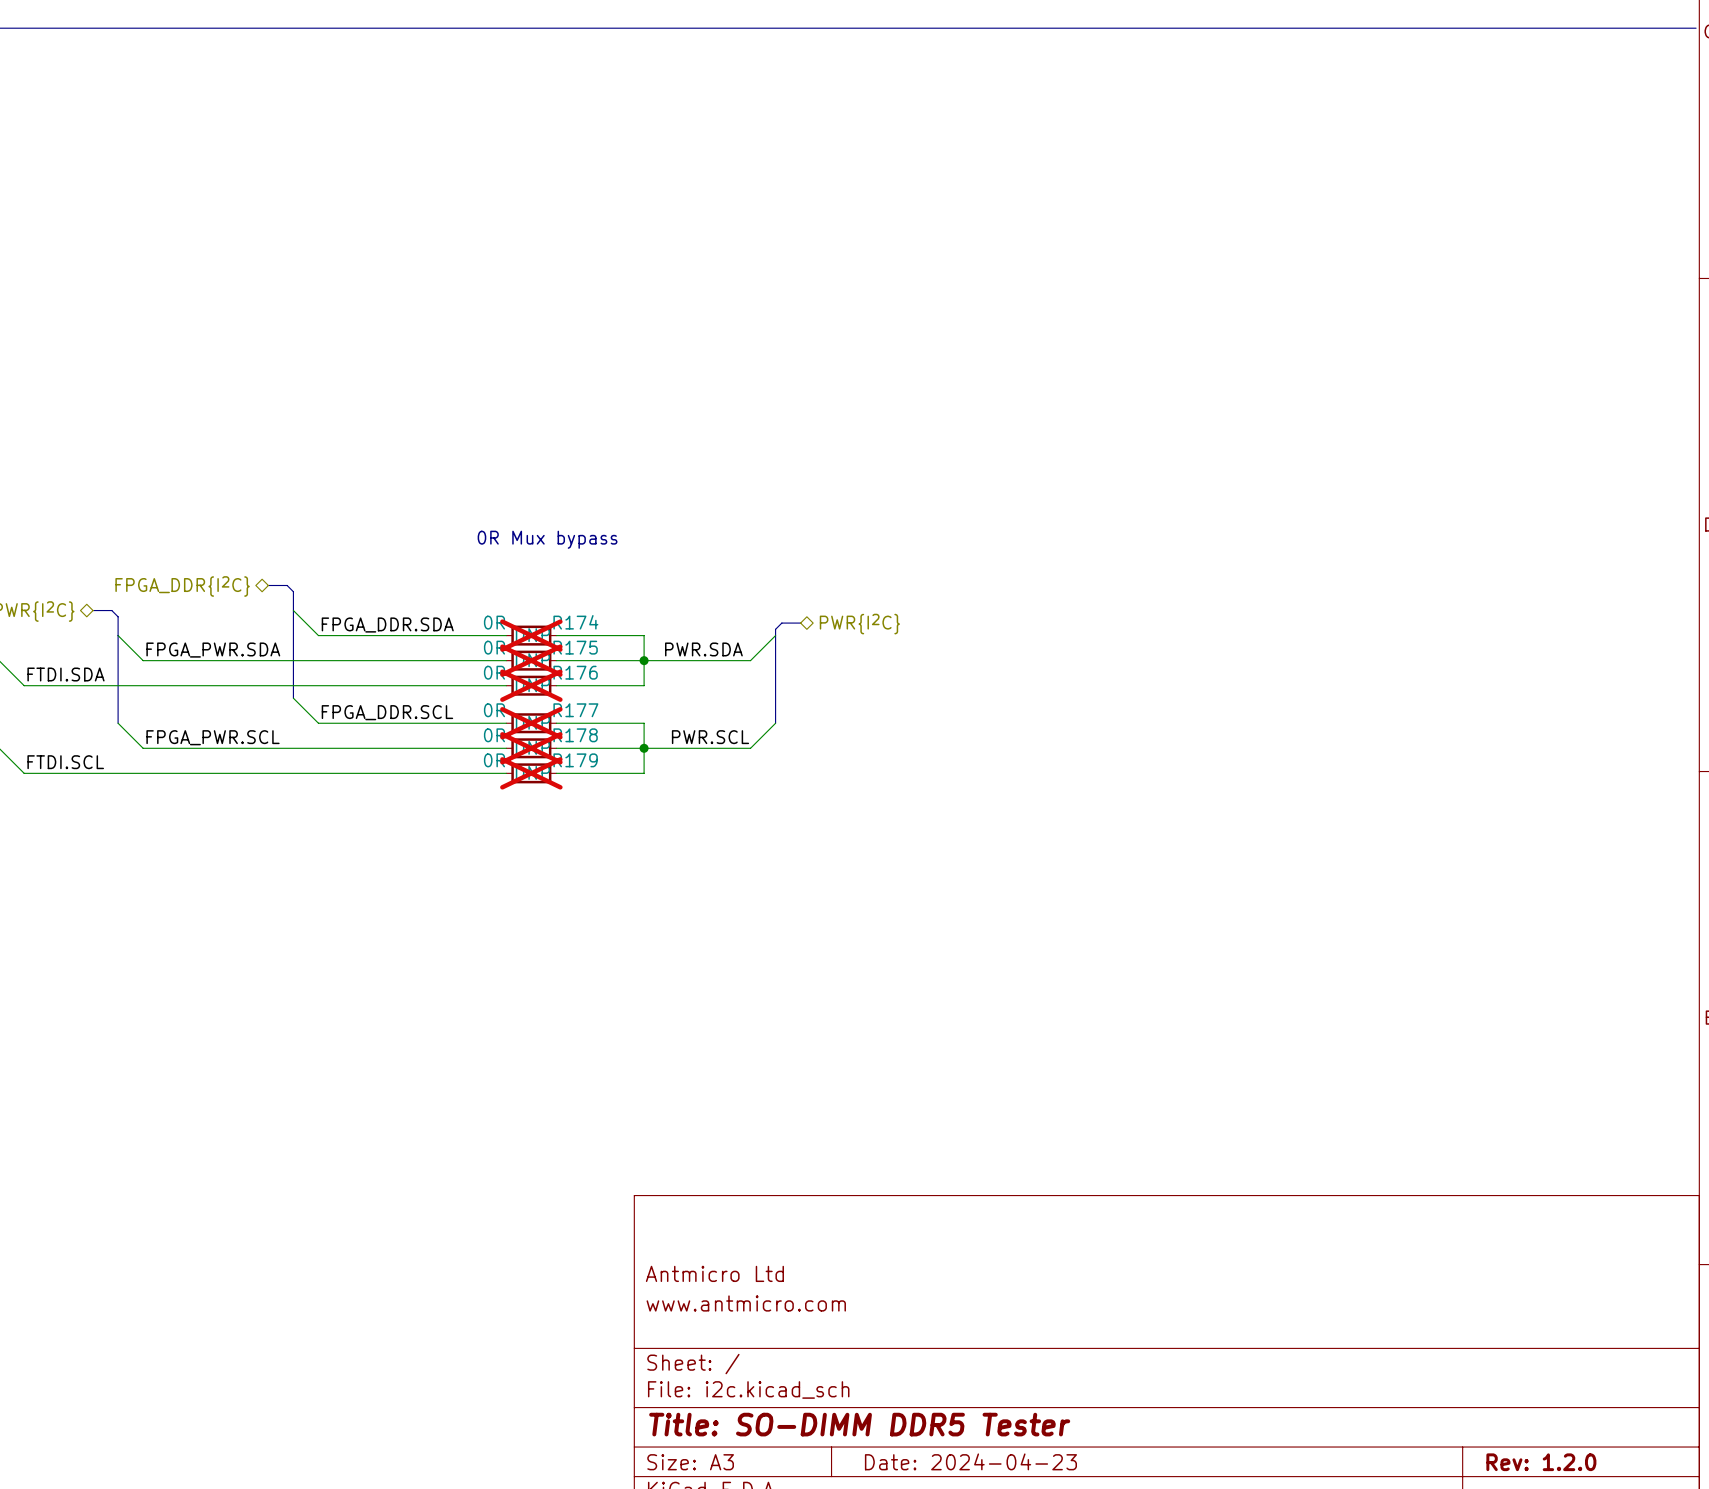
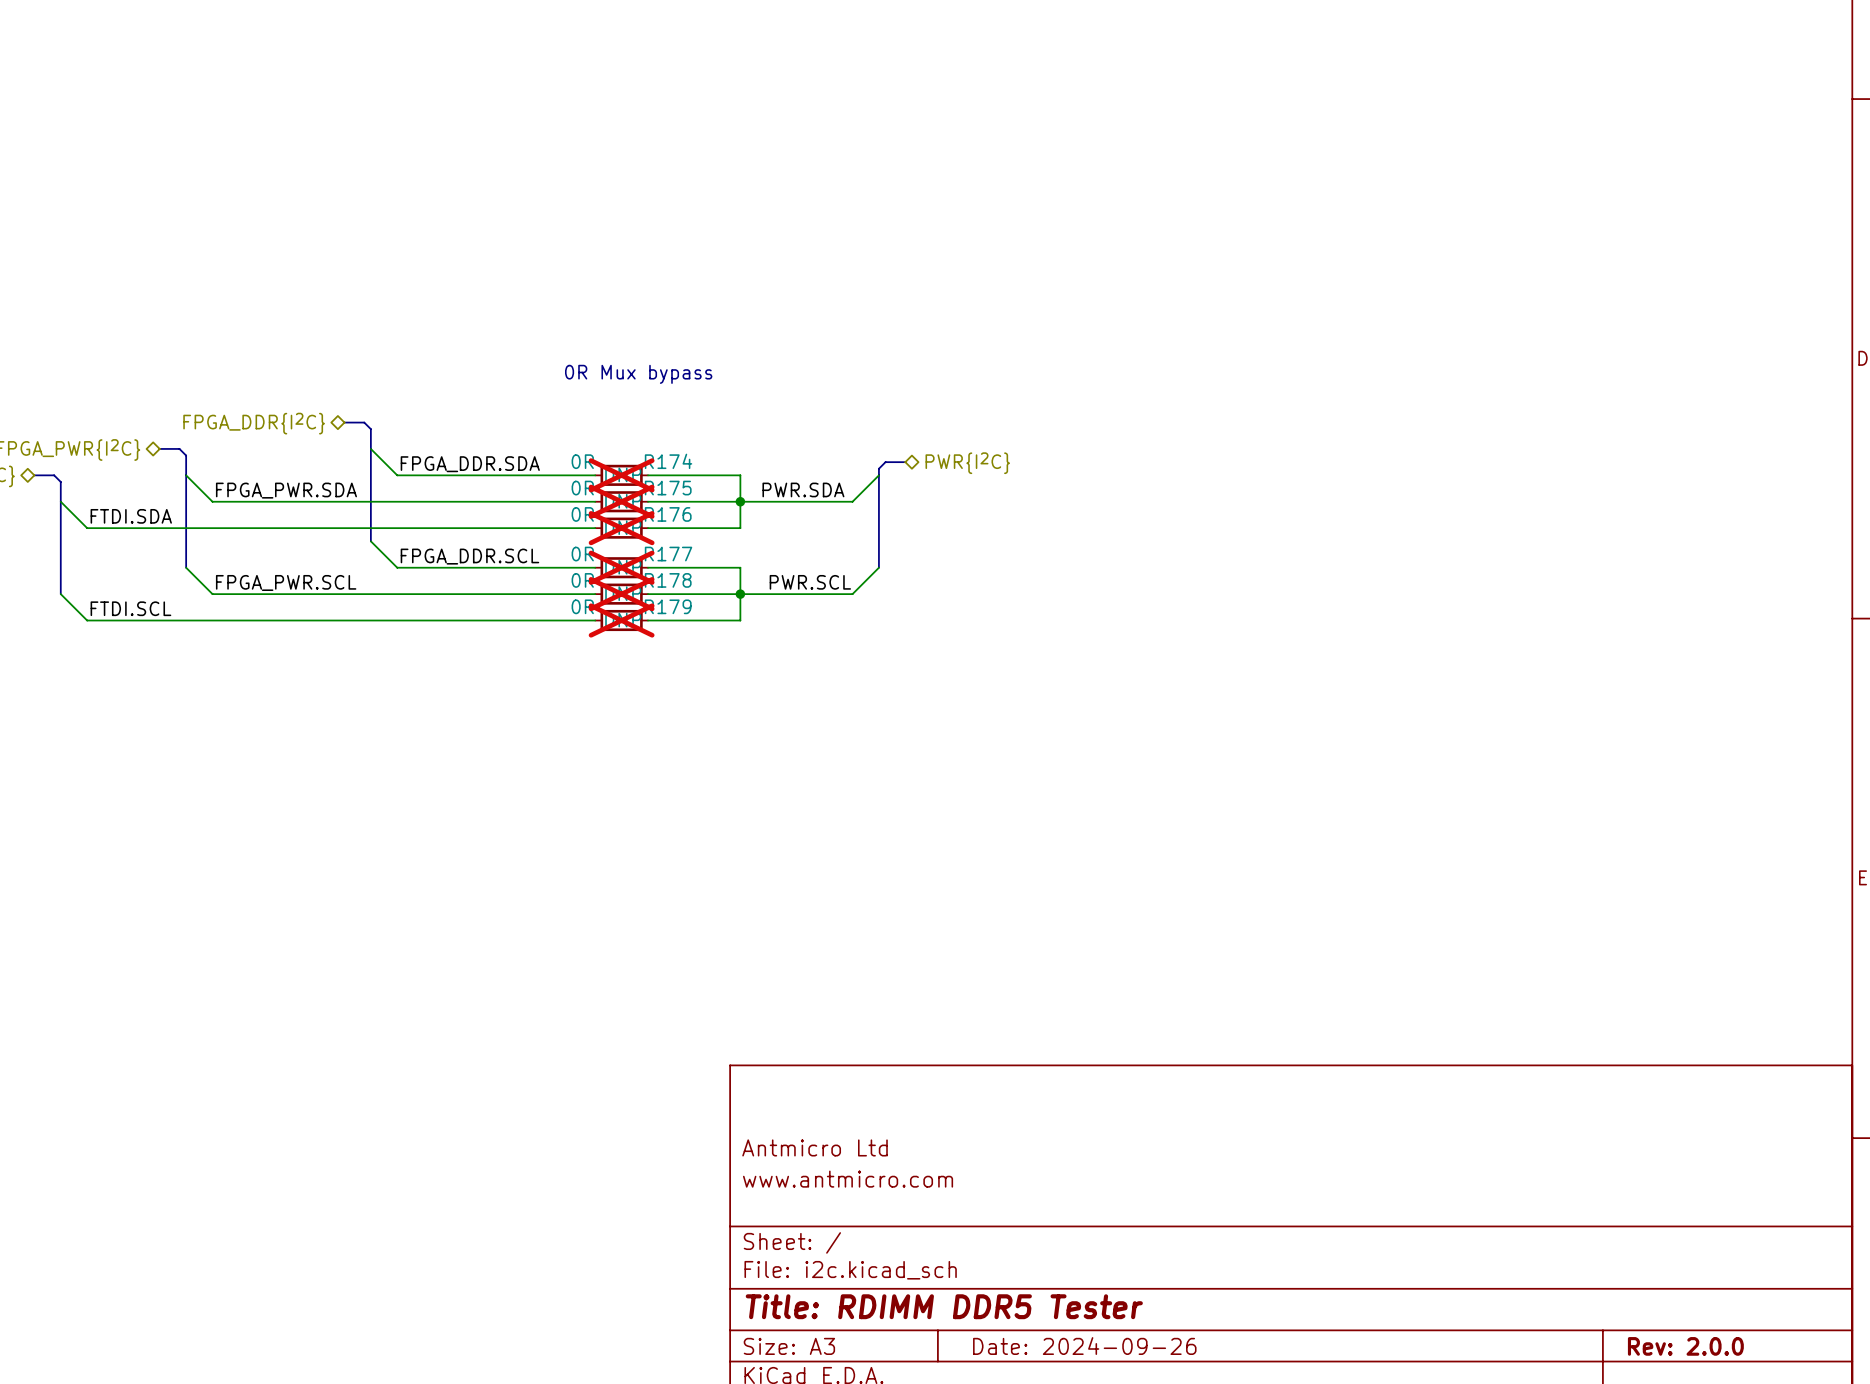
title block: Title: SO-DIMM DDR5 Tester (859, 1424) -> Title: RDIMM DDR5 Tester (944, 1306)
title block: Date: 2024-04-23 (970, 1461) -> Date: 2024-09-26 (1084, 1346)
title block: Rev: 1.2.0 (1541, 1462) -> Rev: 2.0.0 (1685, 1346)

